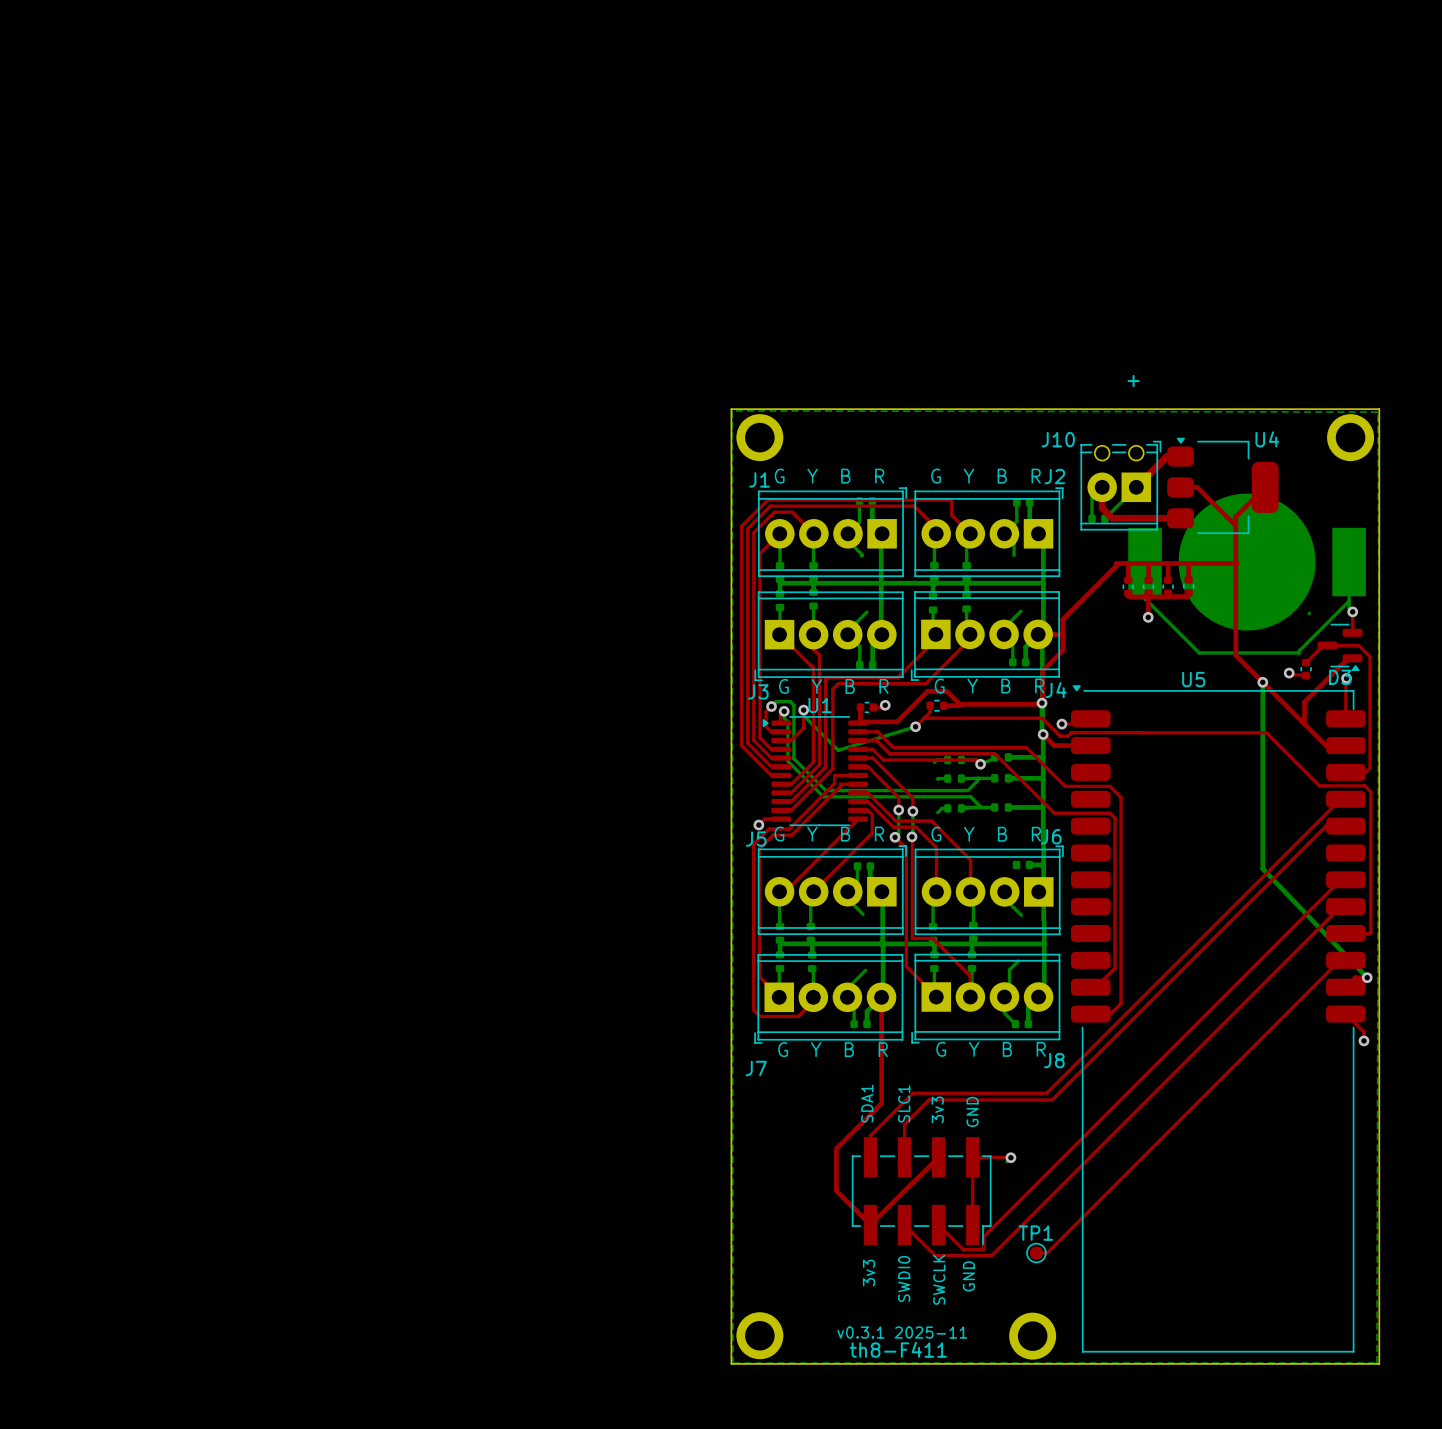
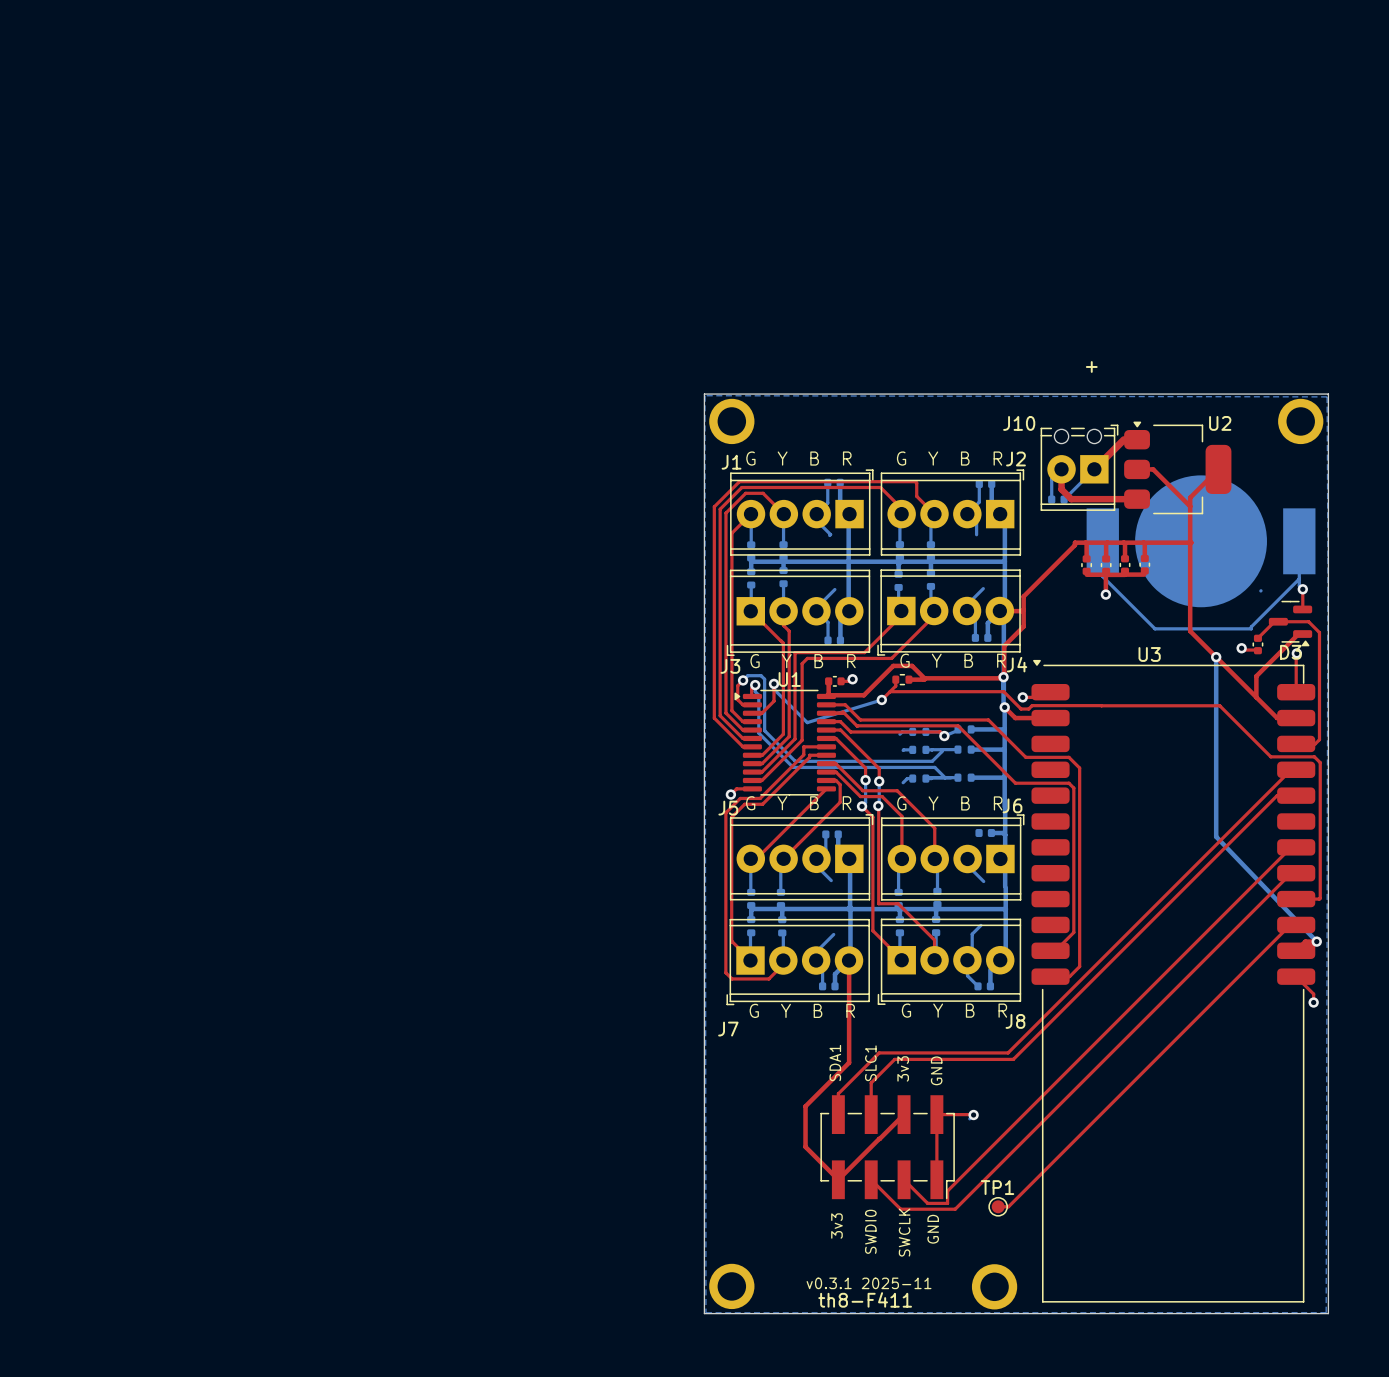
U4 name: U4 (1267, 439) -> U2 (1220, 423)
U5 name: U5 (1193, 679) -> U3 (1149, 654)

